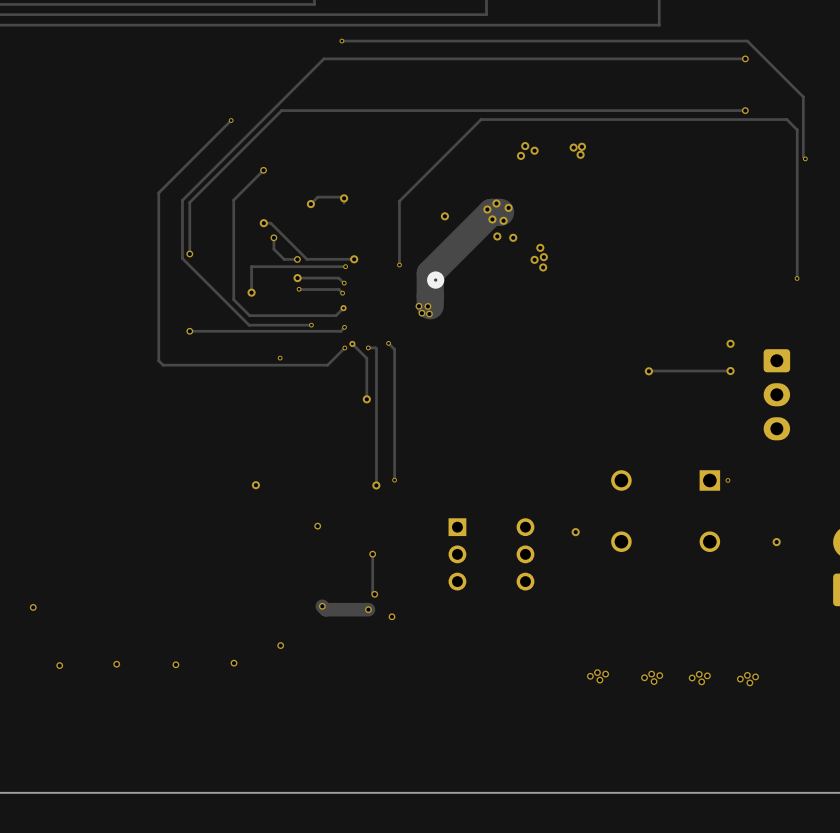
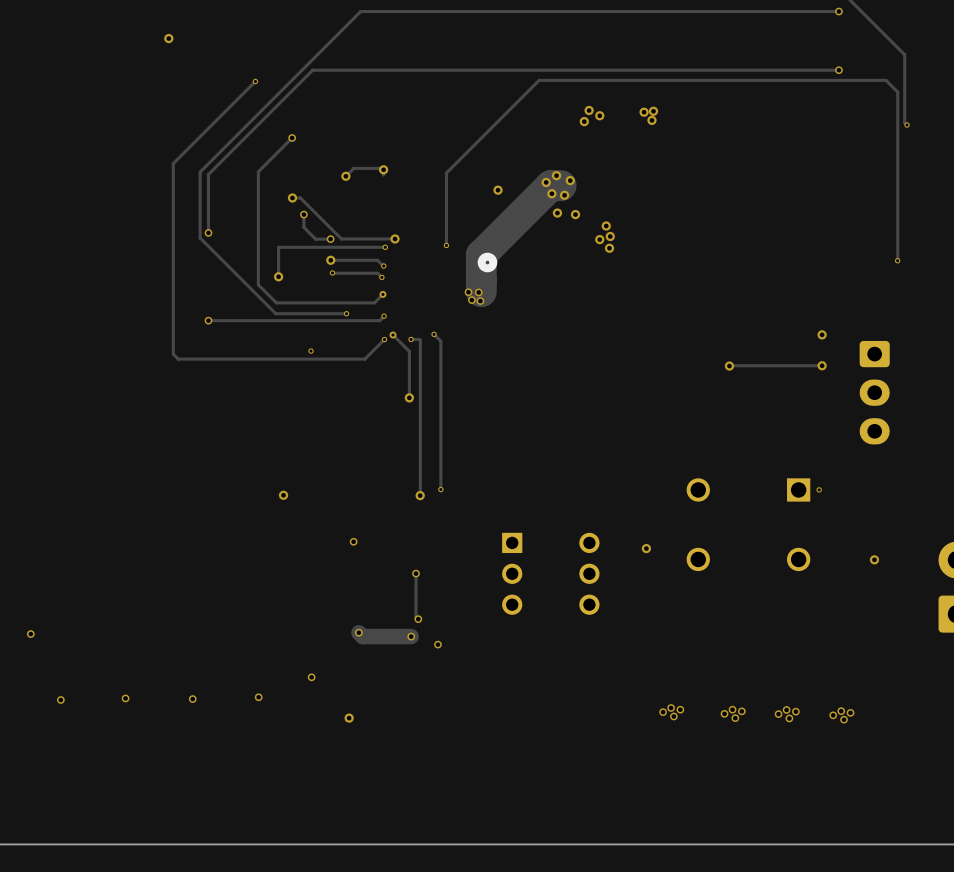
via: none -> (168, 38)
via: none -> (349, 718)

